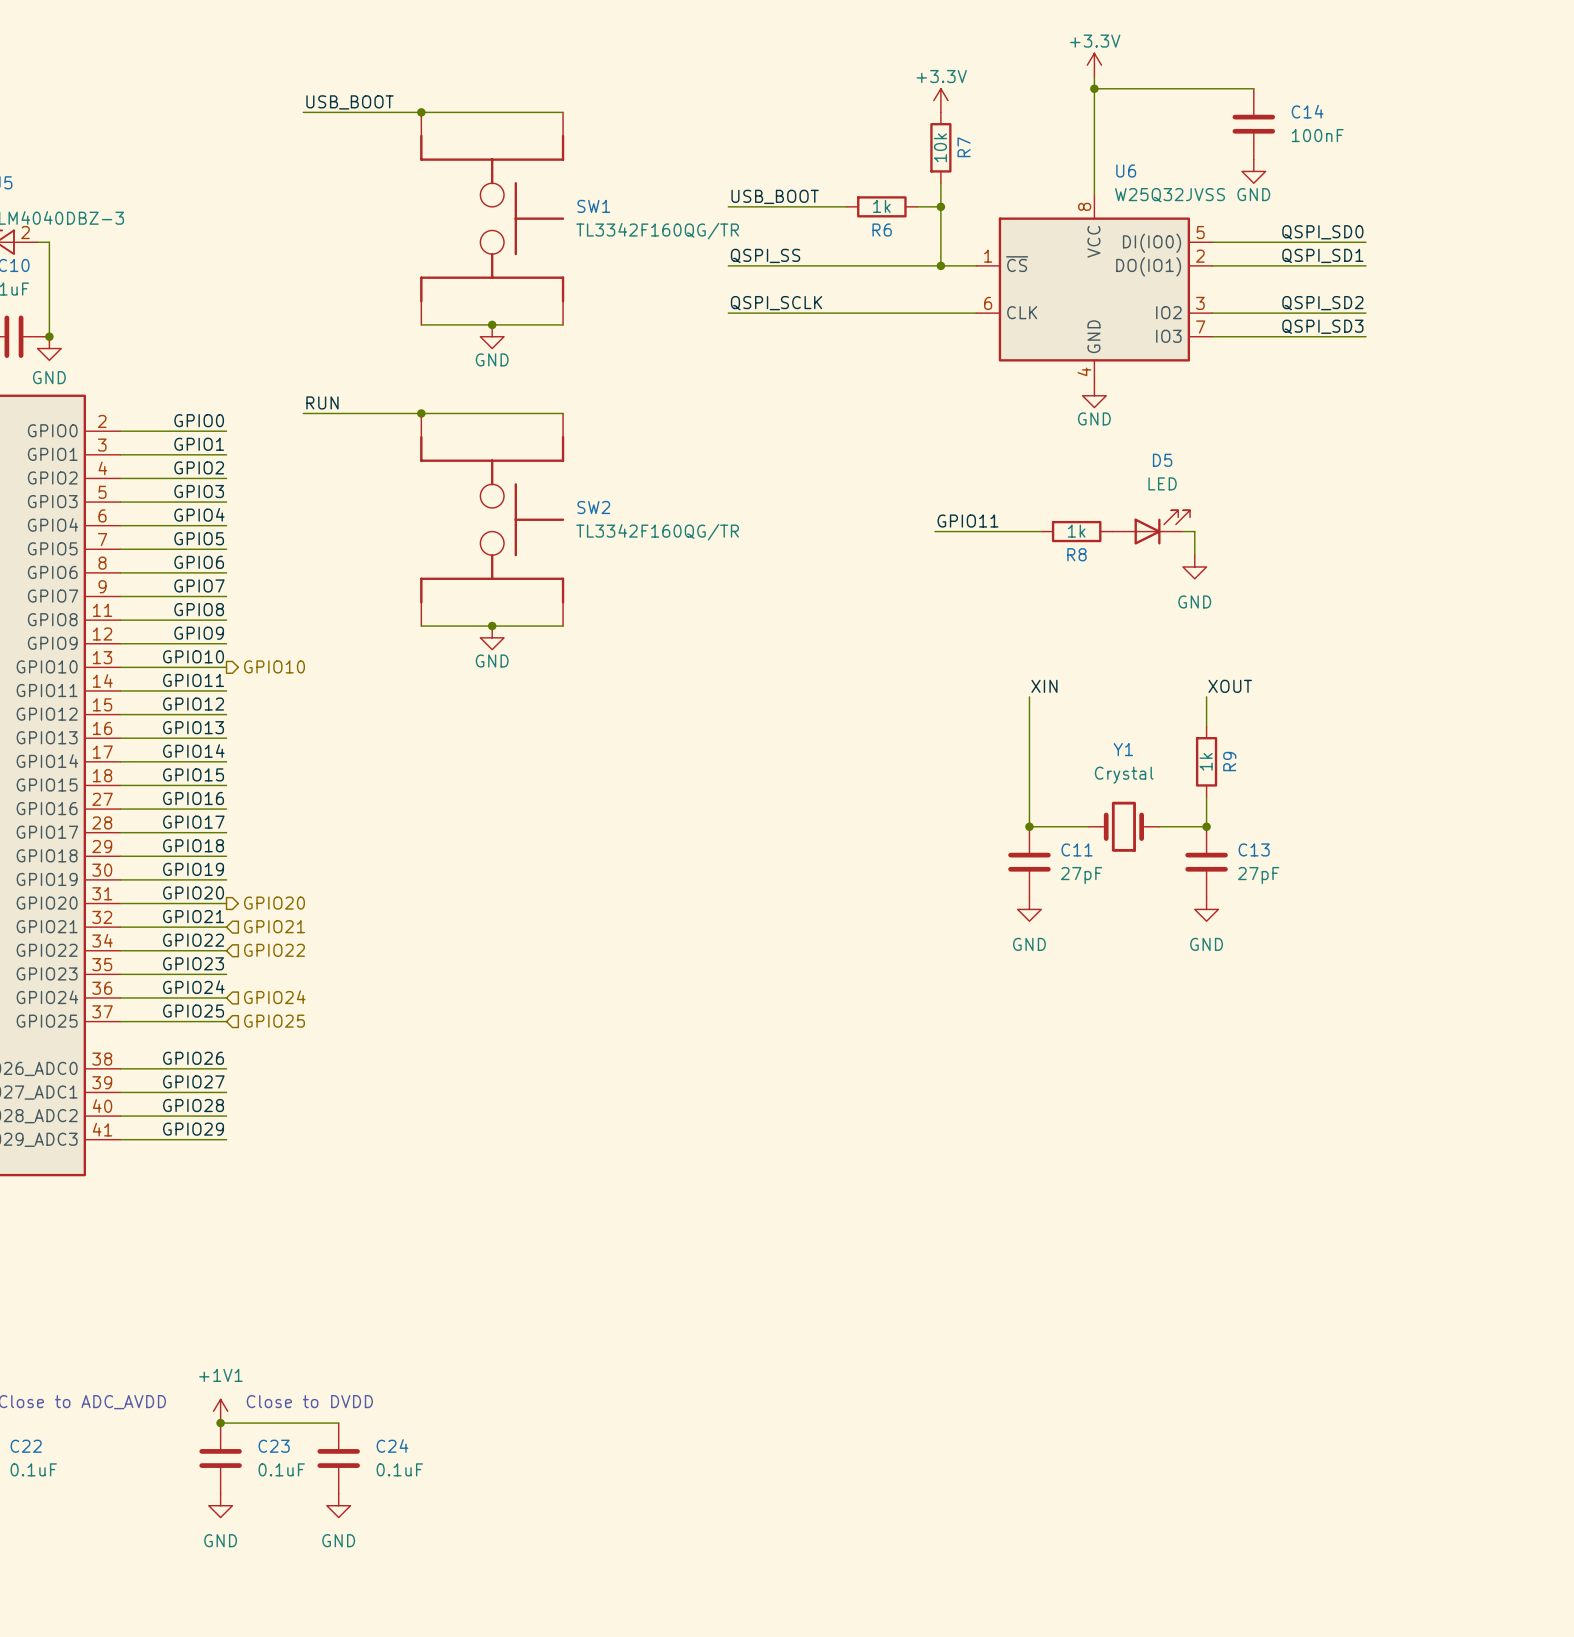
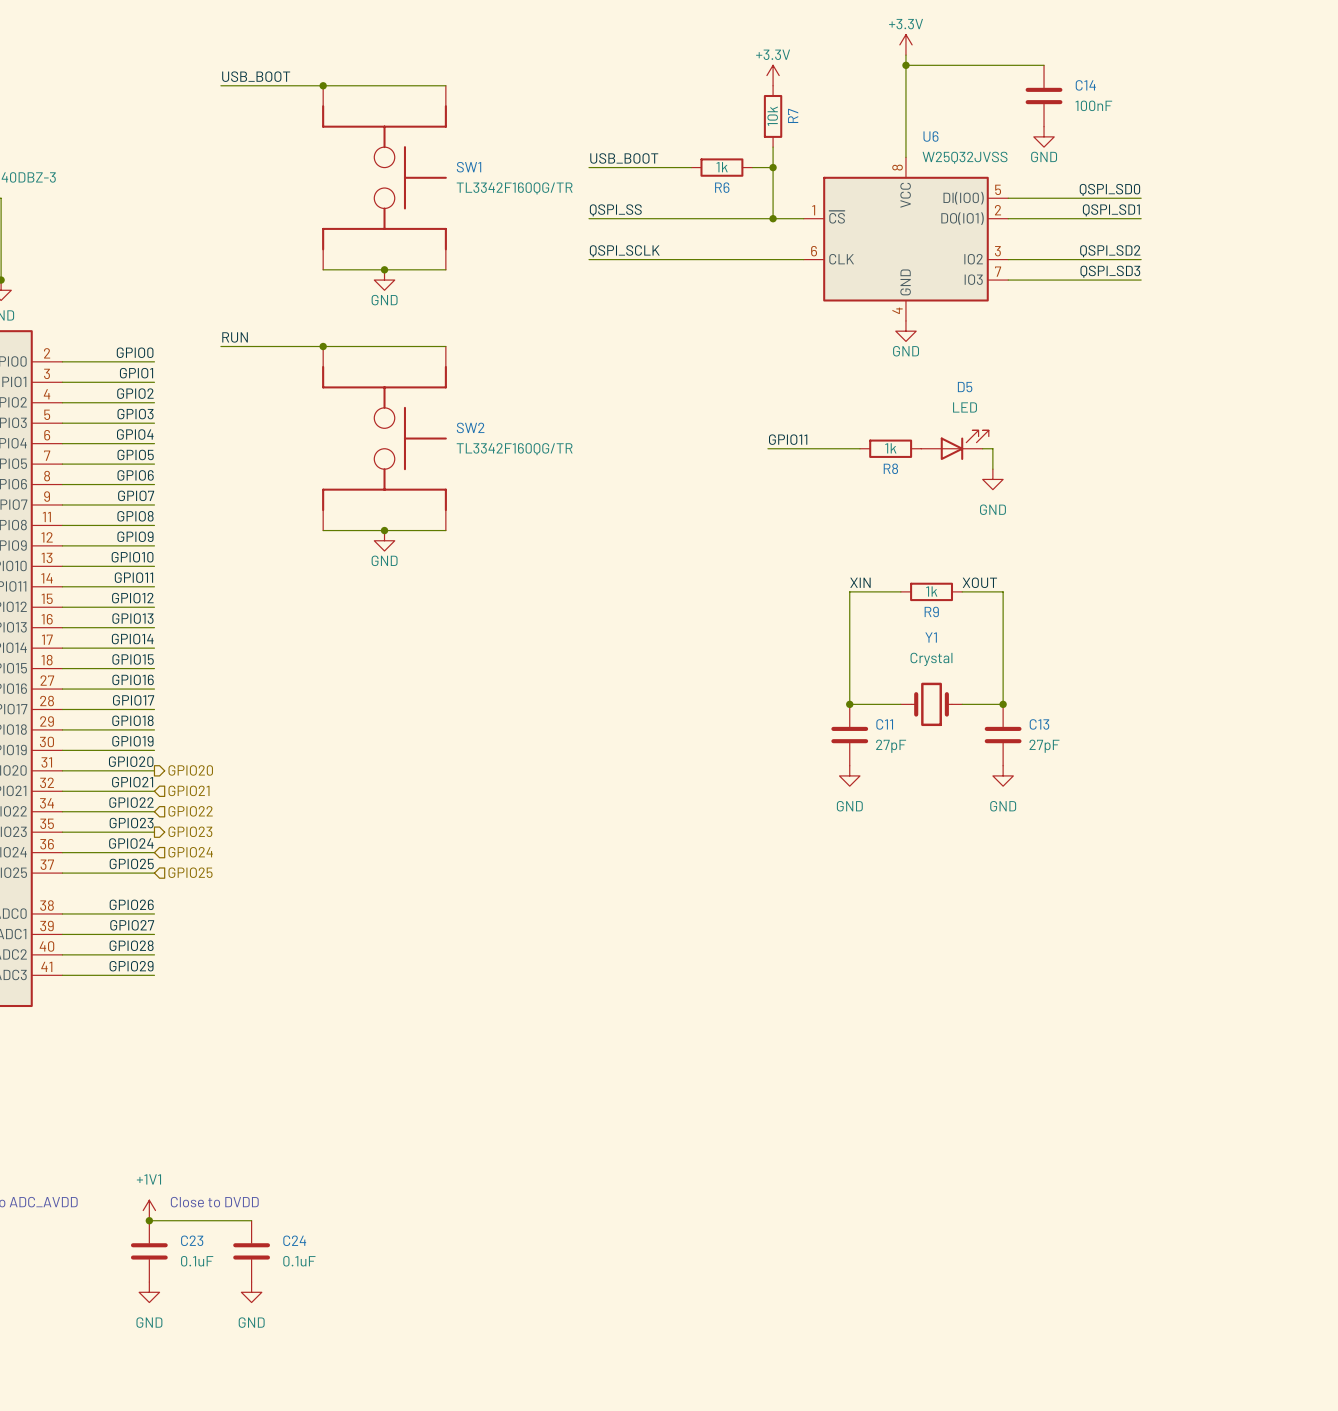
hierarchical label: GPIO10 (274, 666) -> none
label position: XOUT (1230, 686) -> XOUT (979, 582)
wire: none -> (849, 591) (900, 591)
wire: none -> (962, 591) (1003, 591)
wire: none -> (1003, 617) (1003, 678)
R9 rotation: 0° (1206, 761) -> 90° clockwise (931, 591)
R9 position: (1206, 761) -> (931, 591)
hierarchical label: none -> GPIO23 (190, 831)

